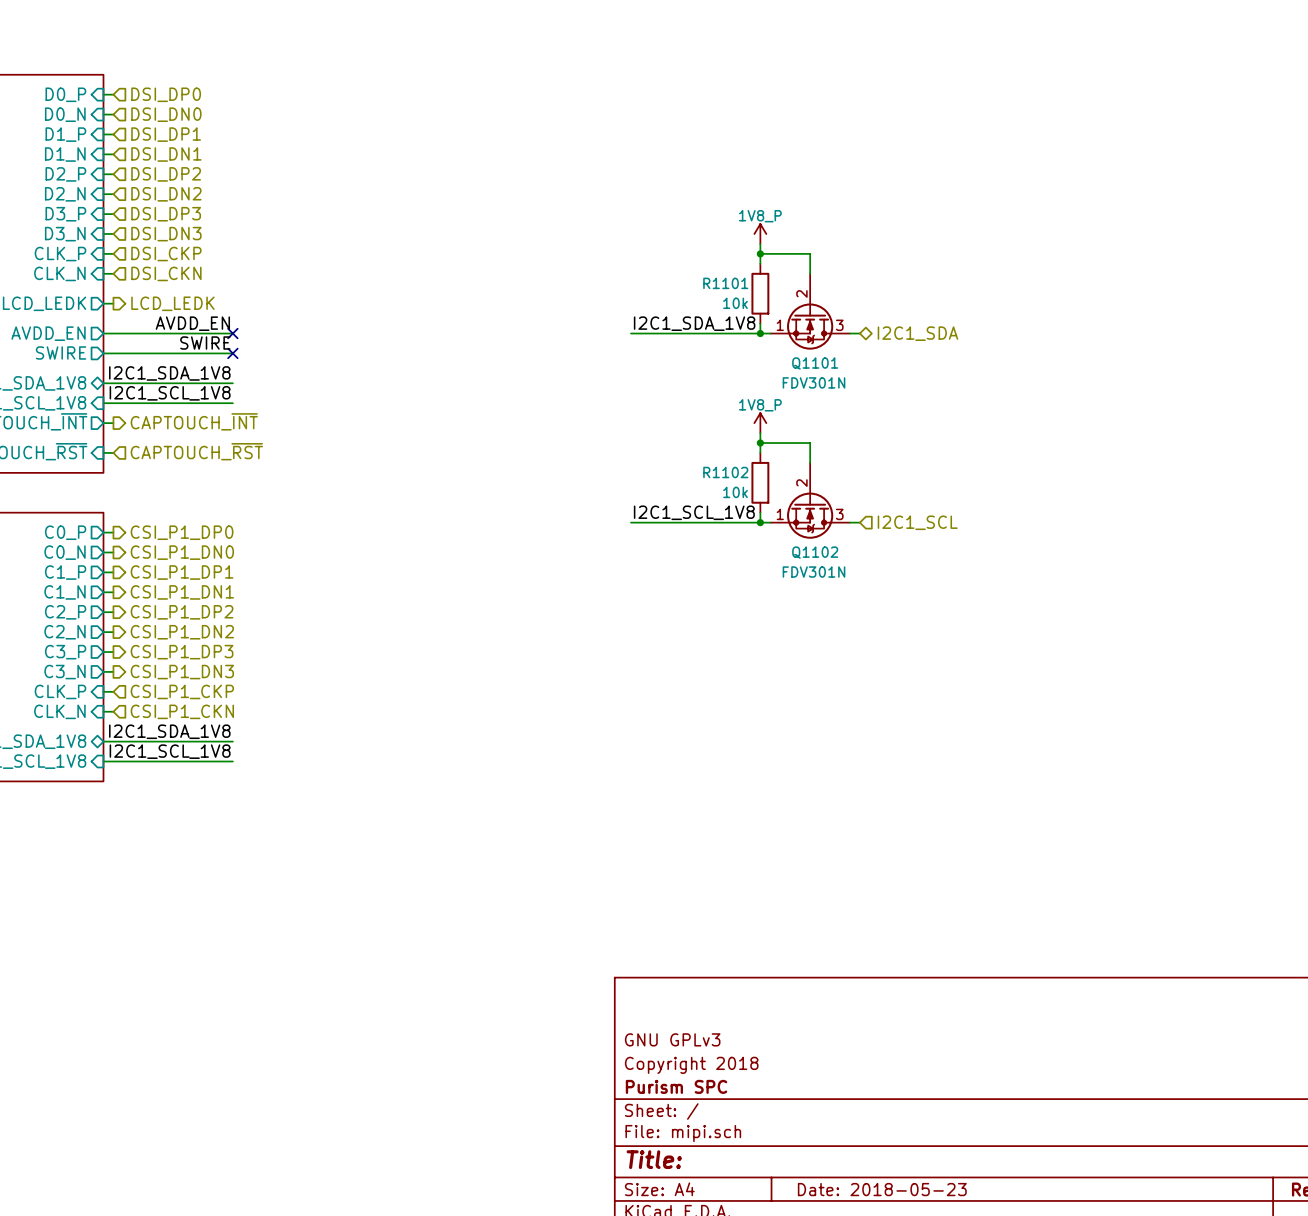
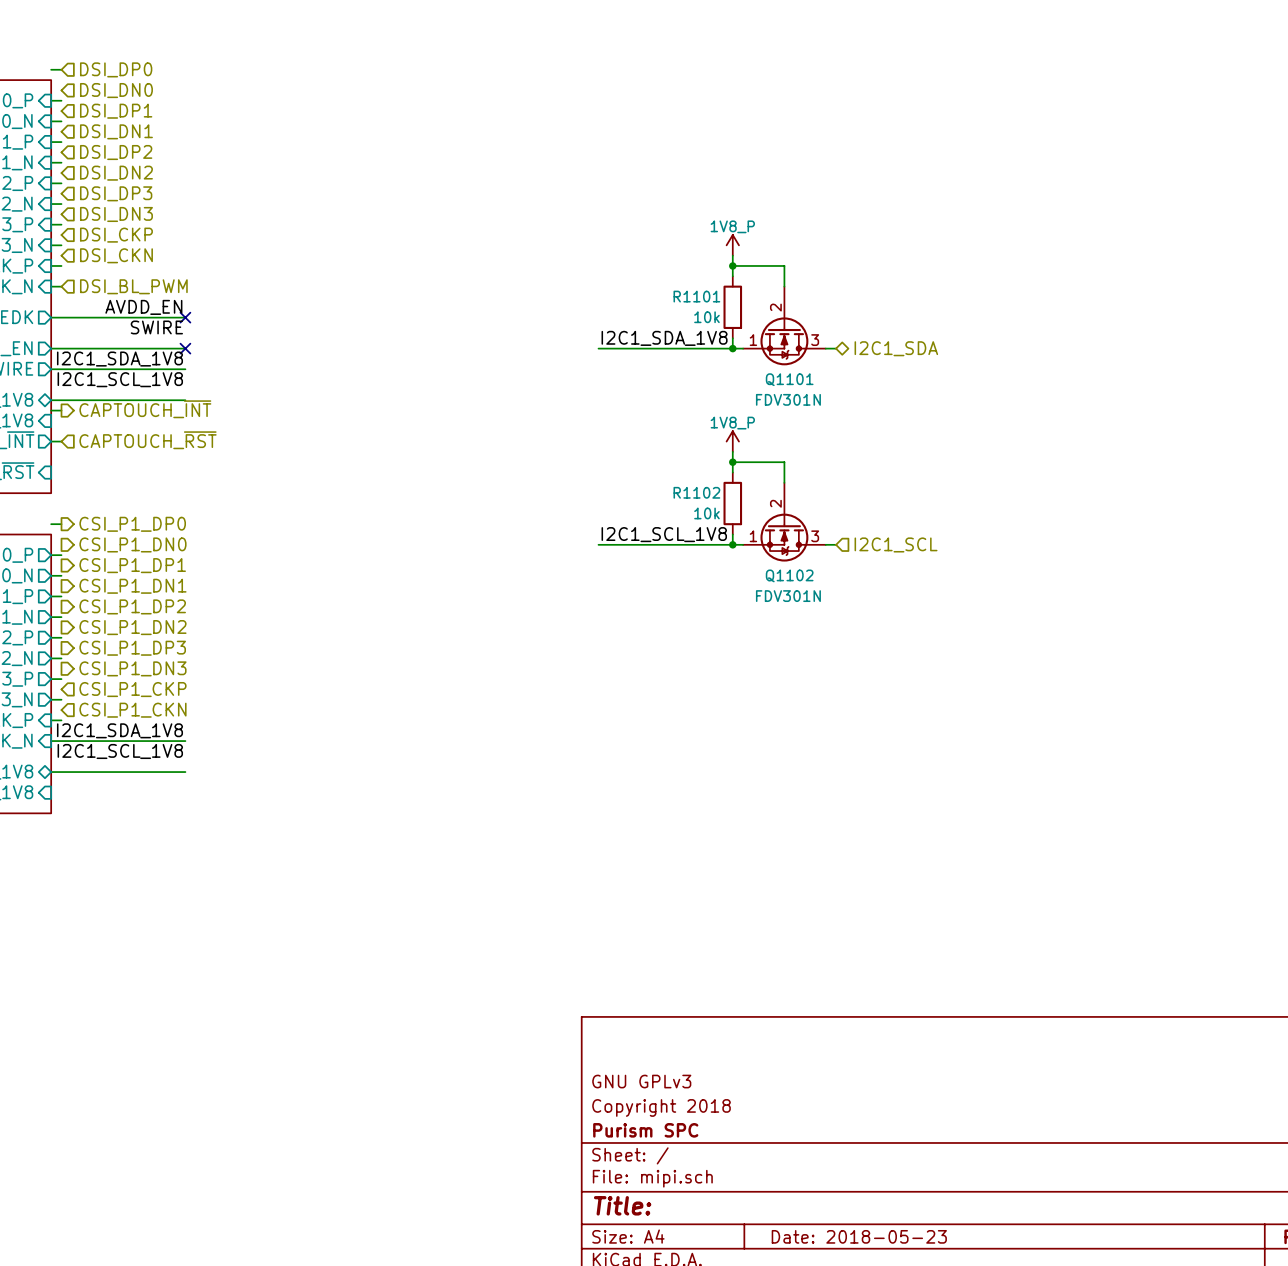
wire: none -> (51, 69) (61, 69)
hierarchical label position: DSI_DP0 (166, 94) -> DSI_DP0 (116, 69)
hierarchical label position: DSI_DN0 (166, 114) -> DSI_DN0 (116, 90)
hierarchical label position: DSI_DP1 (166, 134) -> DSI_DP1 (116, 111)
hierarchical label position: DSI_DN1 (166, 154) -> DSI_DN1 (116, 131)
hierarchical label position: DSI_DP2 (166, 174) -> DSI_DP2 (116, 152)
hierarchical label position: DSI_DN2 (166, 194) -> DSI_DN2 (116, 173)
hierarchical label position: DSI_DP3 (166, 214) -> DSI_DP3 (116, 193)
hierarchical label position: DSI_DN3 (166, 234) -> DSI_DN3 (116, 214)
hierarchical label: none -> DSI_CKN (116, 255)
hierarchical label position: DSI_CKP (166, 254) -> DSI_CKP (116, 235)
hierarchical label: DSI_CKN (166, 273) -> DSI_BL_PWM (133, 286)
wire: none -> (61, 317) (185, 317)
hierarchical label: LCD_LEDK (172, 303) -> none
no-connect mark: none -> (185, 317)
label: none -> SWIRE (156, 327)
label position: AVDD_EN (192, 323) -> AVDD_EN (143, 307)
label: SWIRE (205, 343) -> I2C1_SDA_1V8 (119, 359)
no-connect mark: (232, 353) -> none
label: I2C1_SDA_1V8 (169, 373) -> none
hierarchical label: none -> CAPTOUCH_~{INT} (145, 409)
wire: none -> (51, 410) (61, 410)
label position: I2C1_SCL_1V8 (170, 393) -> I2C1_SCL_1V8 (120, 379)
wire: (103, 403) (232, 403) -> none
hierarchical label shape: output (194, 421) -> input (148, 440)
hierarchical label: CAPTOUCH_~{INT} (194, 421) -> CAPTOUCH_~{RST} (148, 440)
hierarchical label: CAPTOUCH_~{RST} (196, 451) -> none
wire: (103, 452) (113, 452) -> (51, 524) (61, 524)
hierarchical label position: CSI_P1_DP0 (182, 532) -> CSI_P1_DP0 (132, 524)
hierarchical label position: CSI_P1_DN0 (182, 552) -> CSI_P1_DN0 (132, 544)
hierarchical label position: CSI_P1_DP1 (182, 572) -> CSI_P1_DP1 (132, 565)
hierarchical label position: CSI_P1_DN1 (182, 592) -> CSI_P1_DN1 (132, 586)
hierarchical label position: CSI_P1_DP2 (182, 612) -> CSI_P1_DP2 (132, 606)
hierarchical label position: CSI_P1_DN2 (182, 632) -> CSI_P1_DN2 (132, 627)
hierarchical label position: CSI_P1_DP3 (182, 652) -> CSI_P1_DP3 (132, 648)
hierarchical label position: CSI_P1_DN3 (182, 672) -> CSI_P1_DN3 (132, 668)
hierarchical label position: CSI_P1_CKP (182, 691) -> CSI_P1_CKP (132, 689)
wire: none -> (61, 741) (185, 741)
hierarchical label position: CSI_P1_CKN (182, 711) -> CSI_P1_CKN (132, 710)
label position: I2C1_SDA_1V8 (169, 731) -> I2C1_SDA_1V8 (119, 730)
label position: I2C1_SCL_1V8 (170, 751) -> I2C1_SCL_1V8 (120, 751)
wire: (103, 761) (232, 761) -> none

